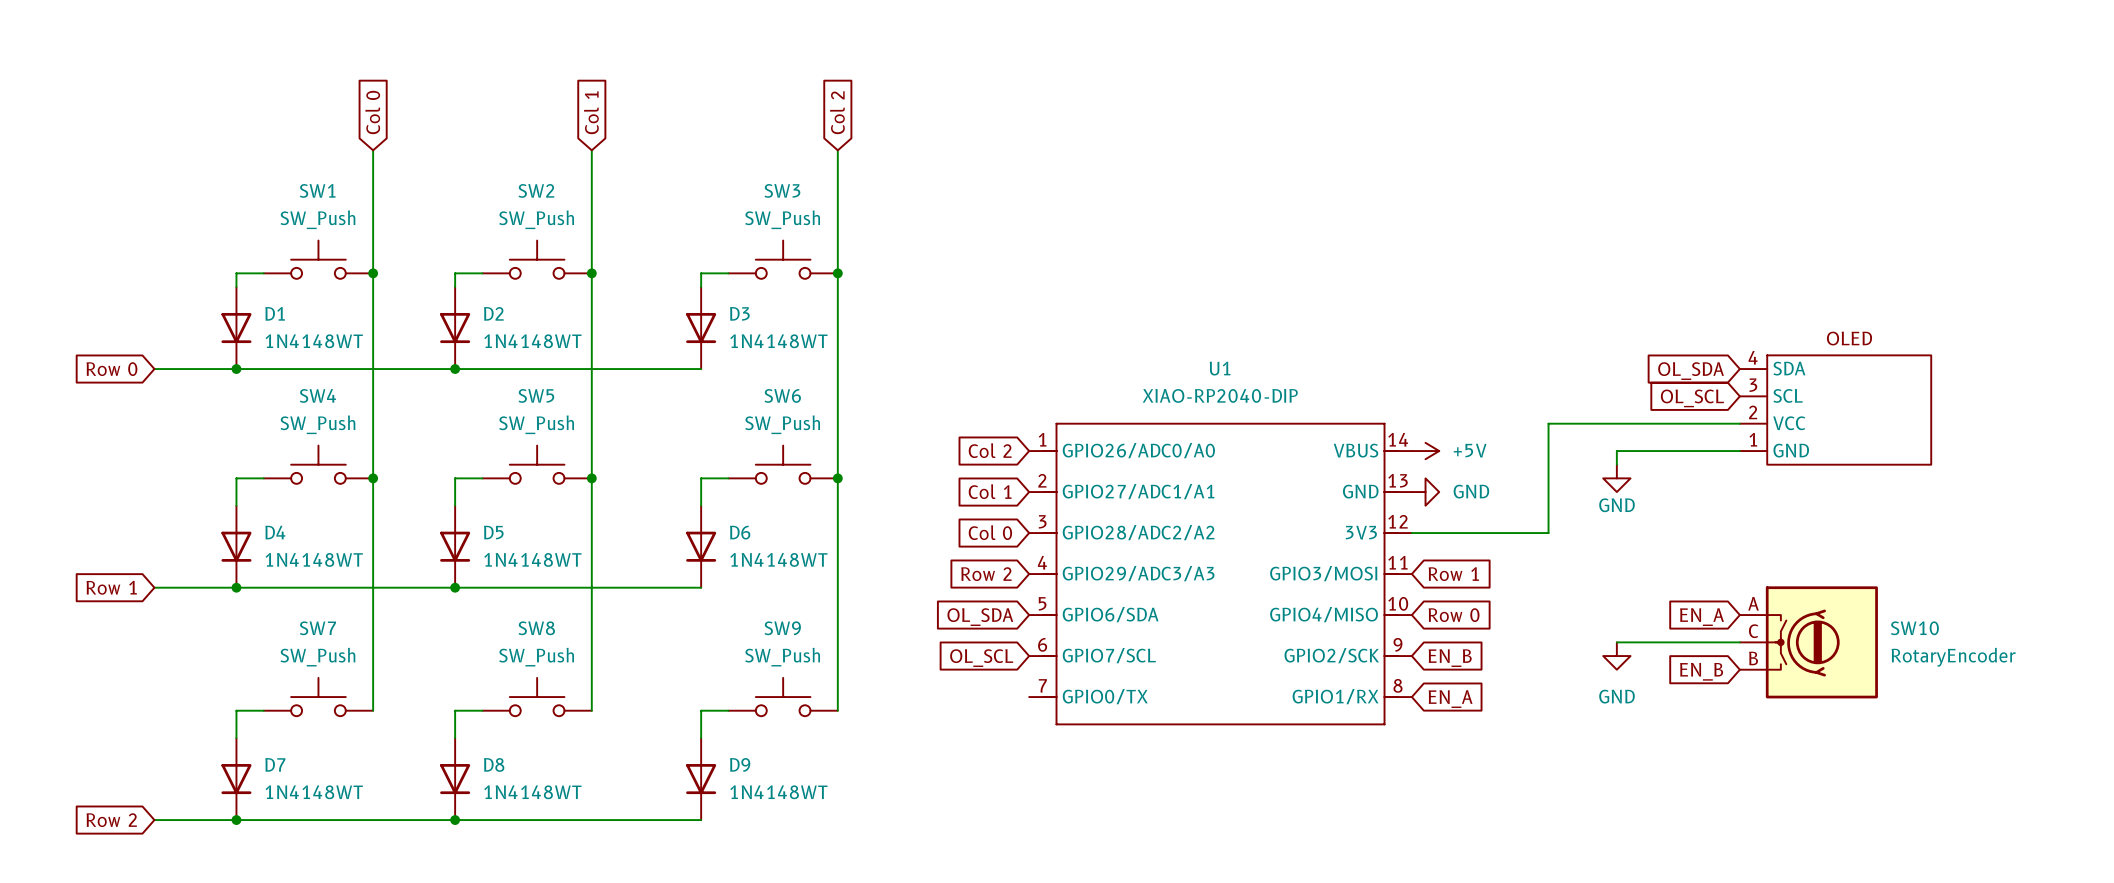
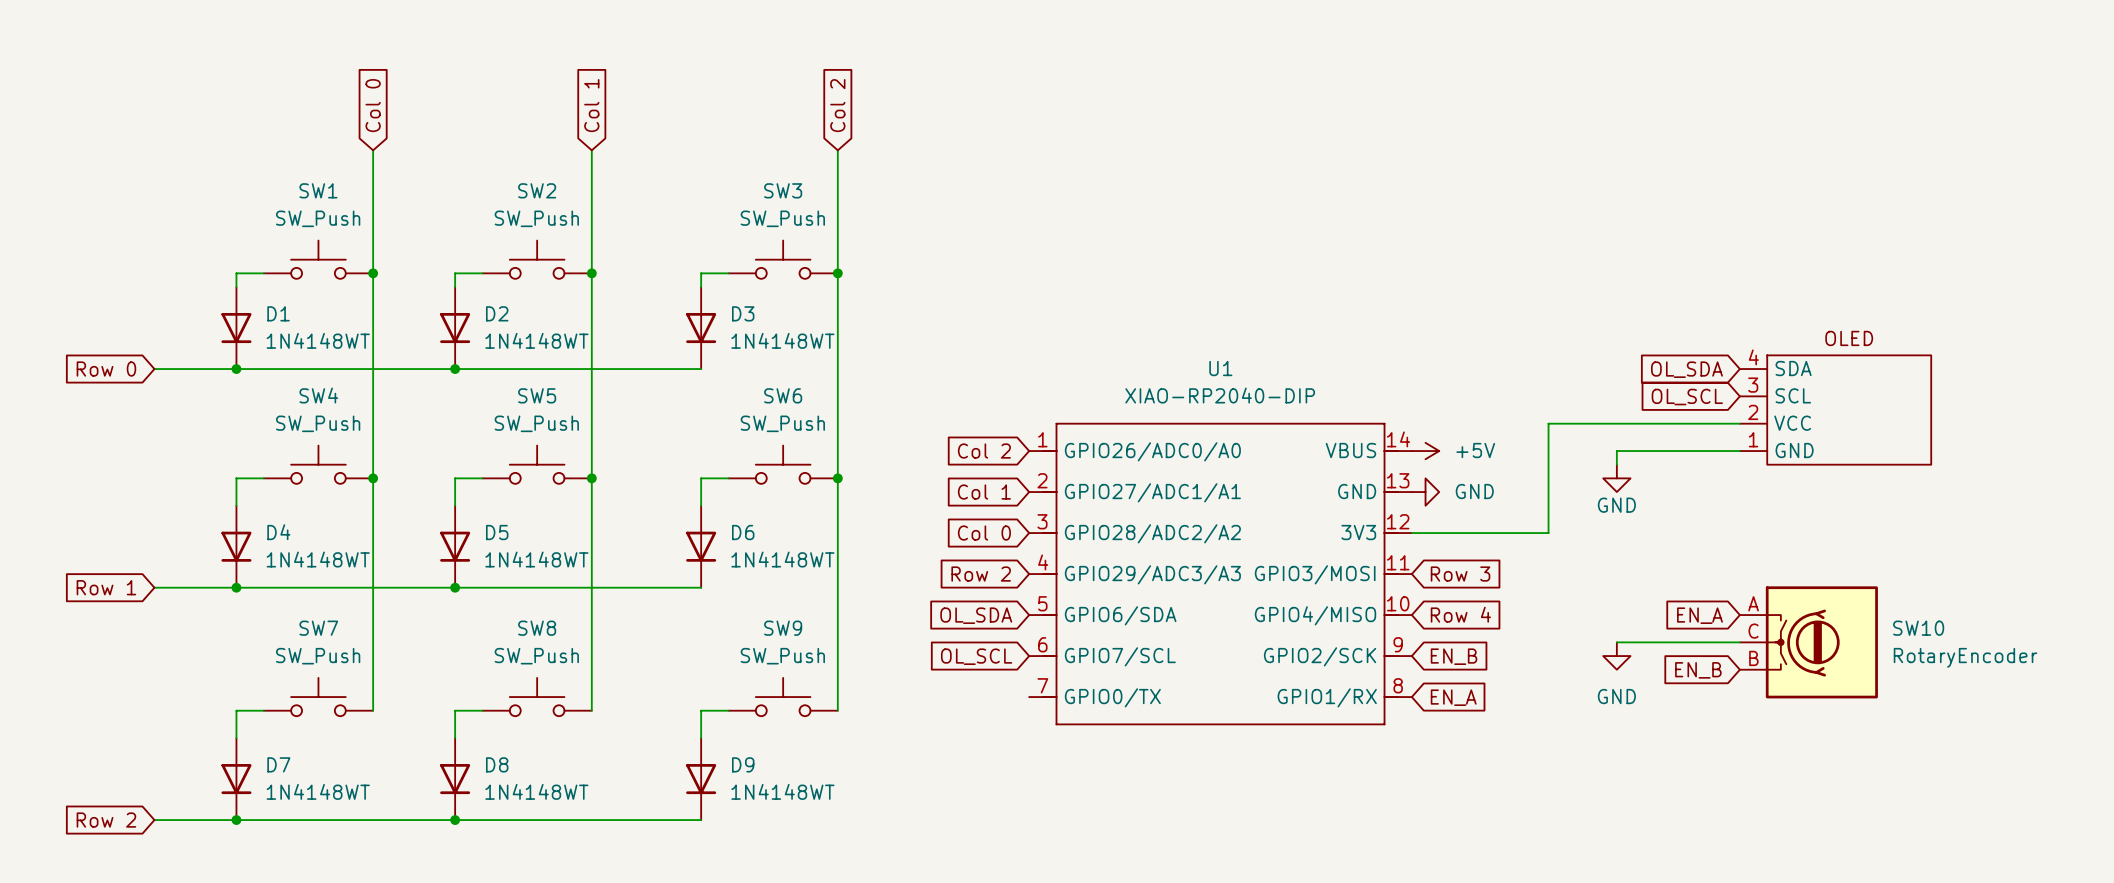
global label: Row 1 (1453, 574) -> Row 3 (1460, 574)
global label: Row 0 (1454, 615) -> Row 4 (1460, 614)

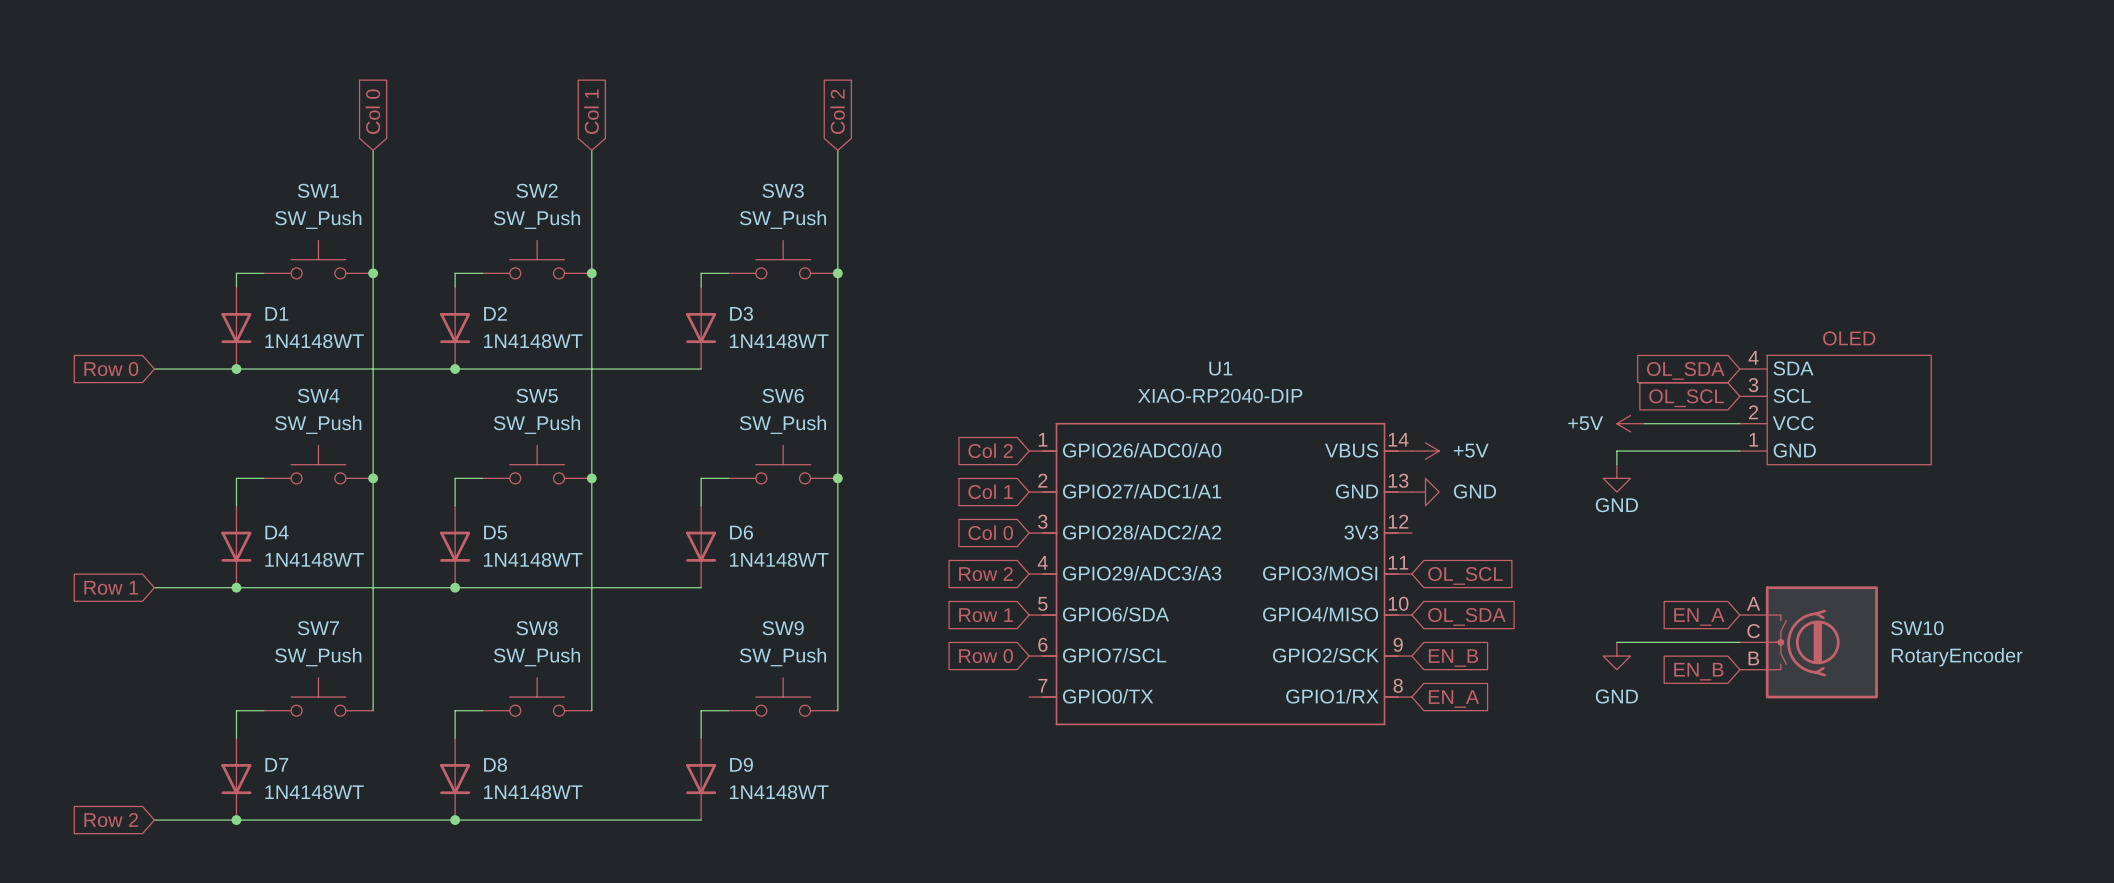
power symbol: none -> +5V (1630, 423)
wire: (1644, 423) (1548, 423) (1548, 533) (1411, 533) -> none
global label: Row 3 (1460, 574) -> OL_SCL (1465, 575)
global label: Row 4 (1460, 614) -> OL_SDA (1466, 616)
global label: OL_SDA (976, 615) -> Row 1 (985, 615)
global label: OL_SCL (976, 656) -> Row 0 (986, 656)

